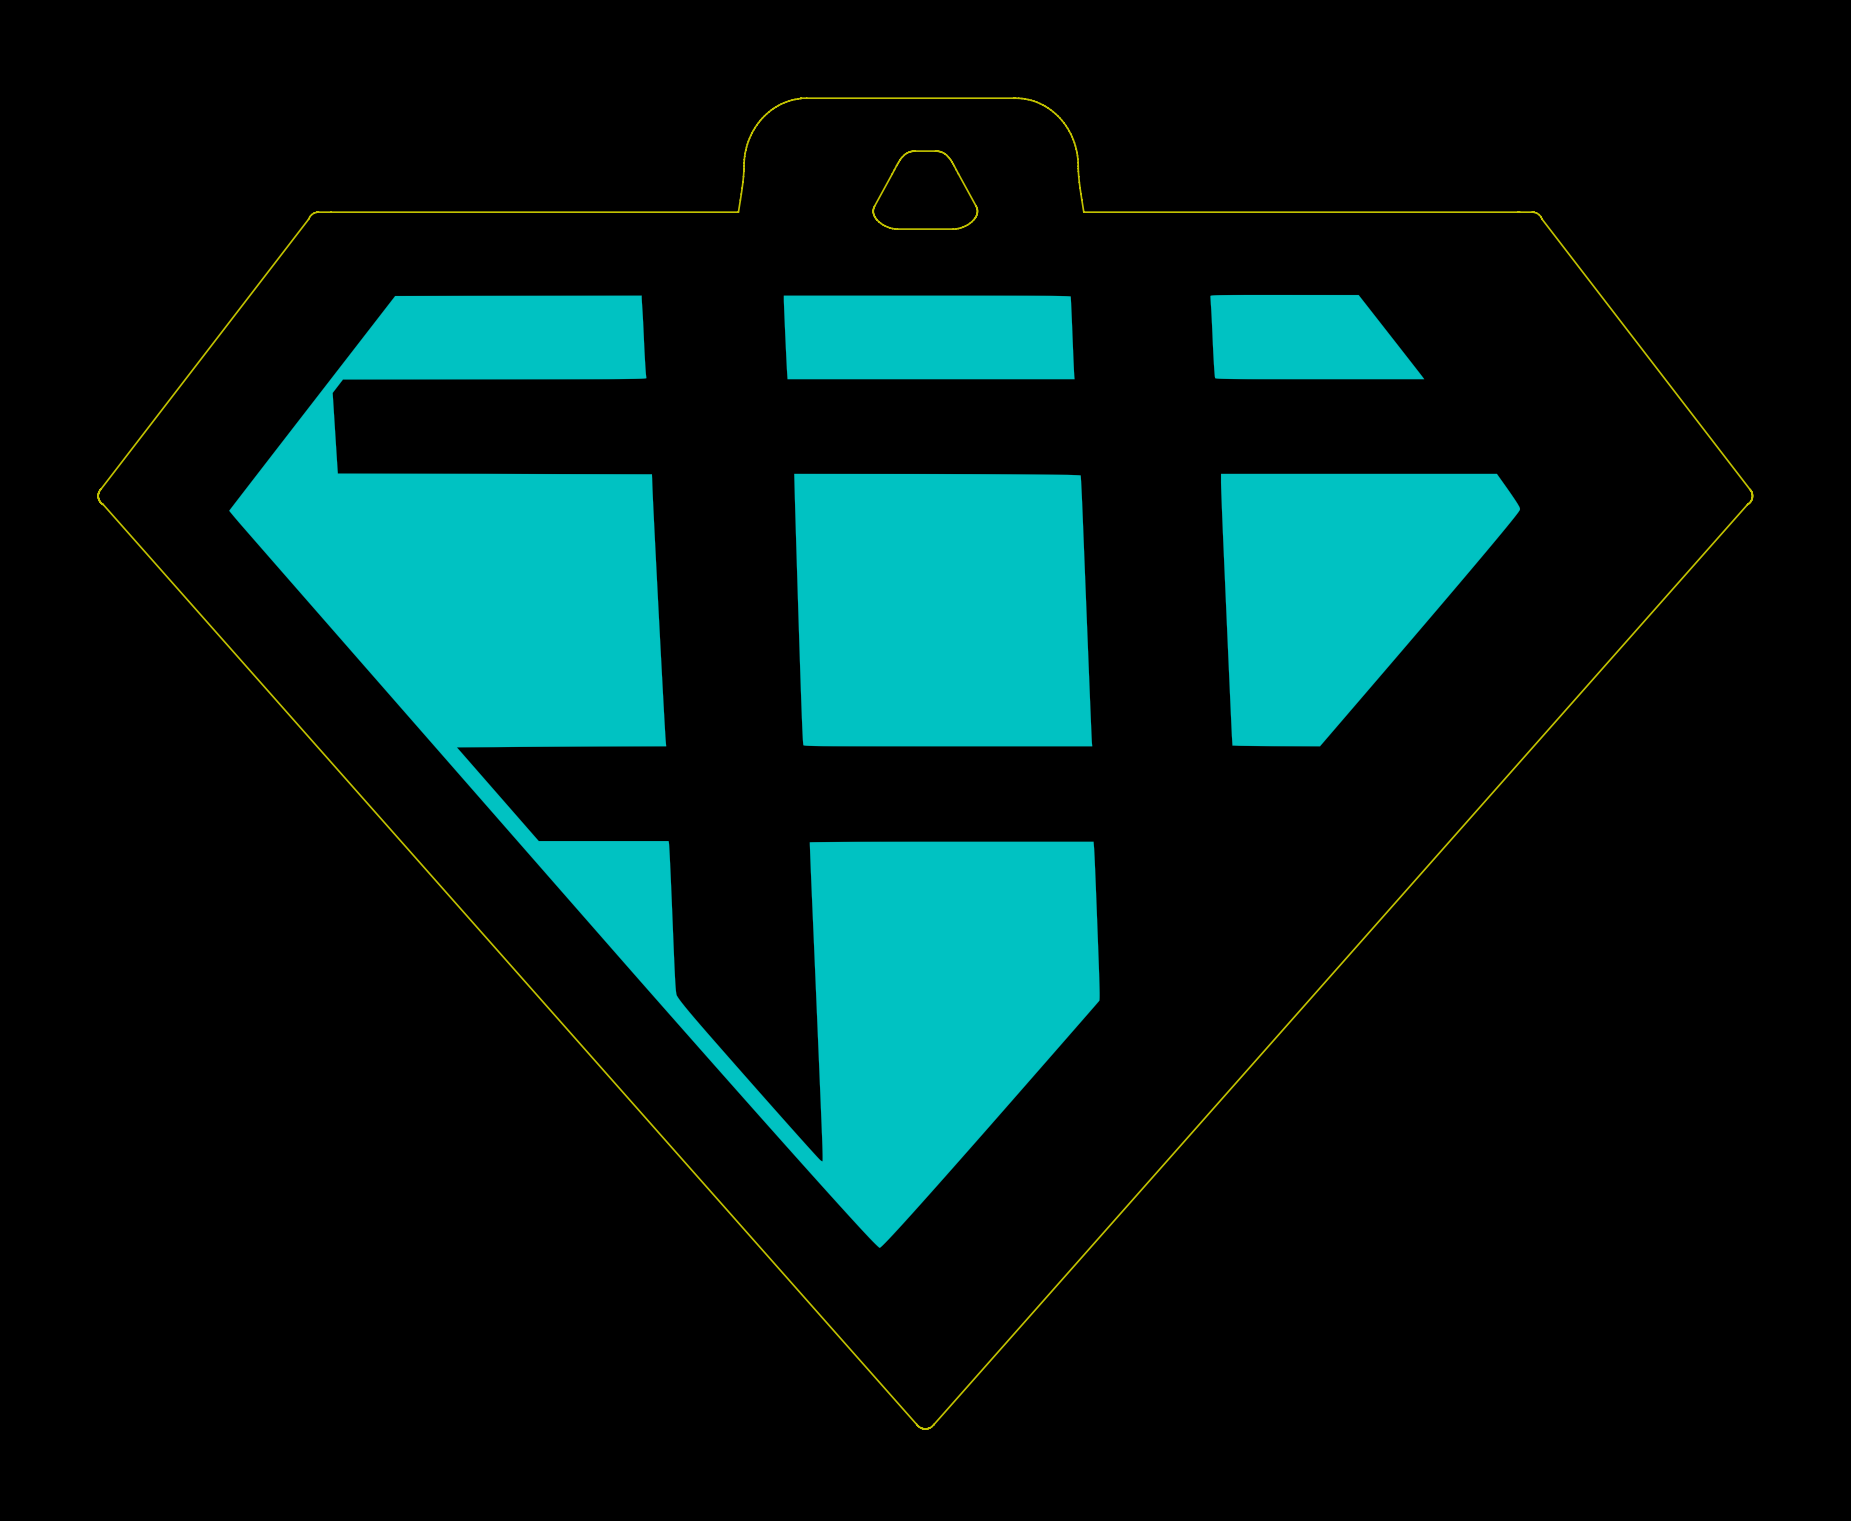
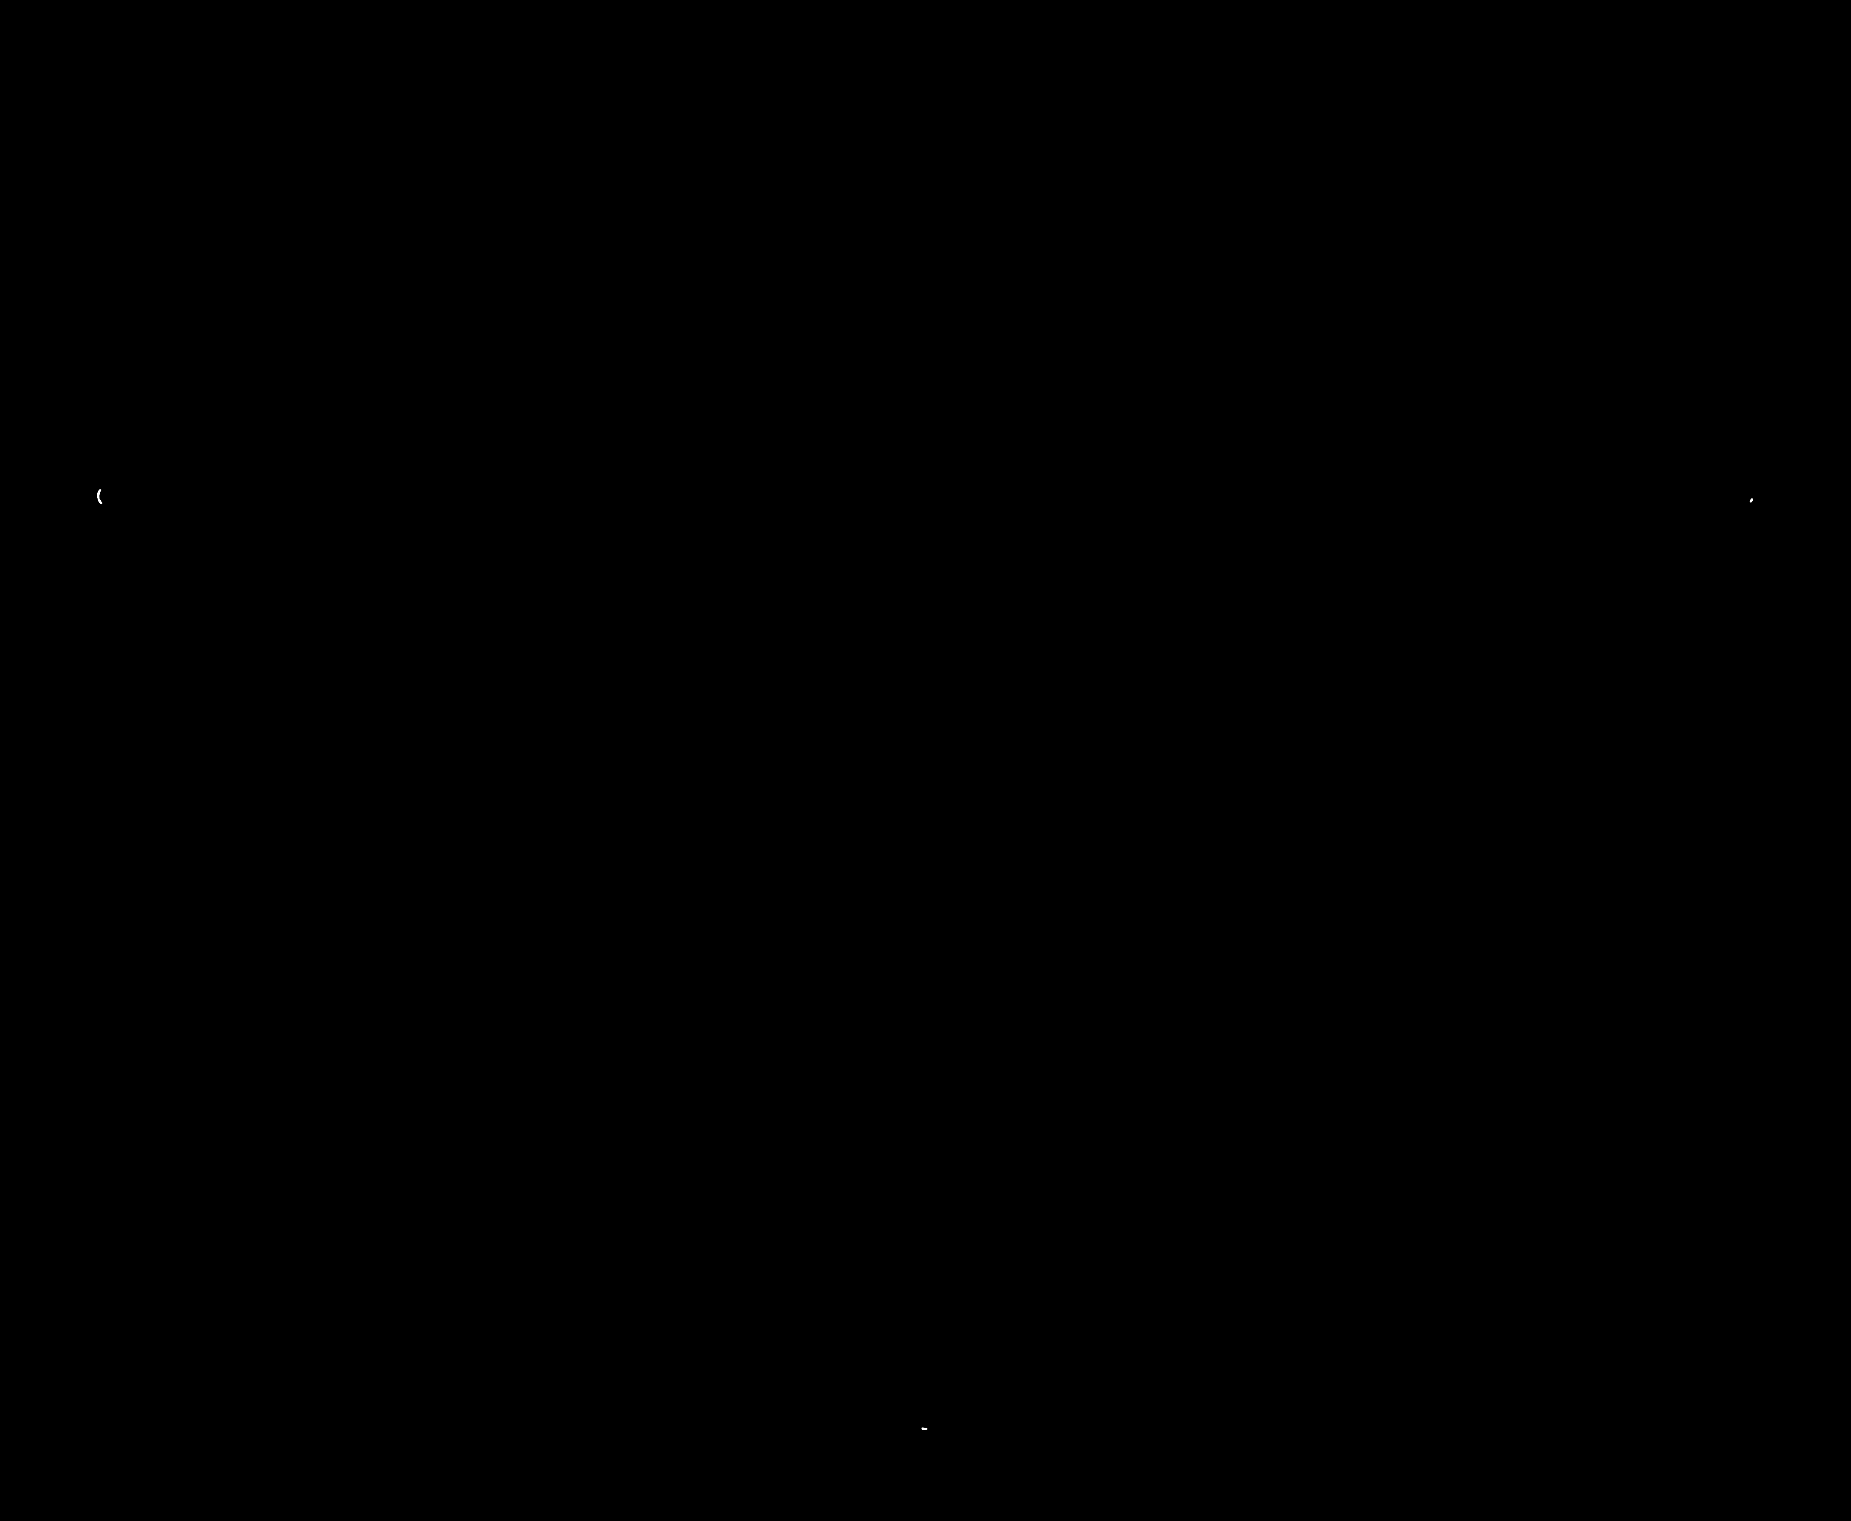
board edge: (913, 151) (903, 155) (896, 165) (874, 207) (873, 213) (876, 219) (885, 226) (897, 229) (955, 228) (969, 223) (976, 216) (977, 208) (949, 158) (938, 151) (913, 151) -> none
board edge: (316, 212) (738, 212) (745, 153) (753, 130) (762, 118) (773, 108) (786, 101) (800, 98) (1015, 98) (1037, 102) (1057, 115) (1072, 136) (1077, 155) (1083, 212) (1533, 212) -> none
board edge: (316, 212) (309, 216) (100, 489) -> none
board edge: (1533, 212) (1540, 216) (1750, 489) -> none
drawing: [229, 294, 1521, 1248] -> none
board edge: (1750, 490) (1751, 491) -> none
board edge: (1751, 491) (1752, 497) -> none
board edge: (1750, 501) (933, 1424) -> none
board edge: (101, 503) (916, 1424) -> none
board edge: (916, 1424) (921, 1428) -> none
board edge: (933, 1424) (928, 1428) -> none

